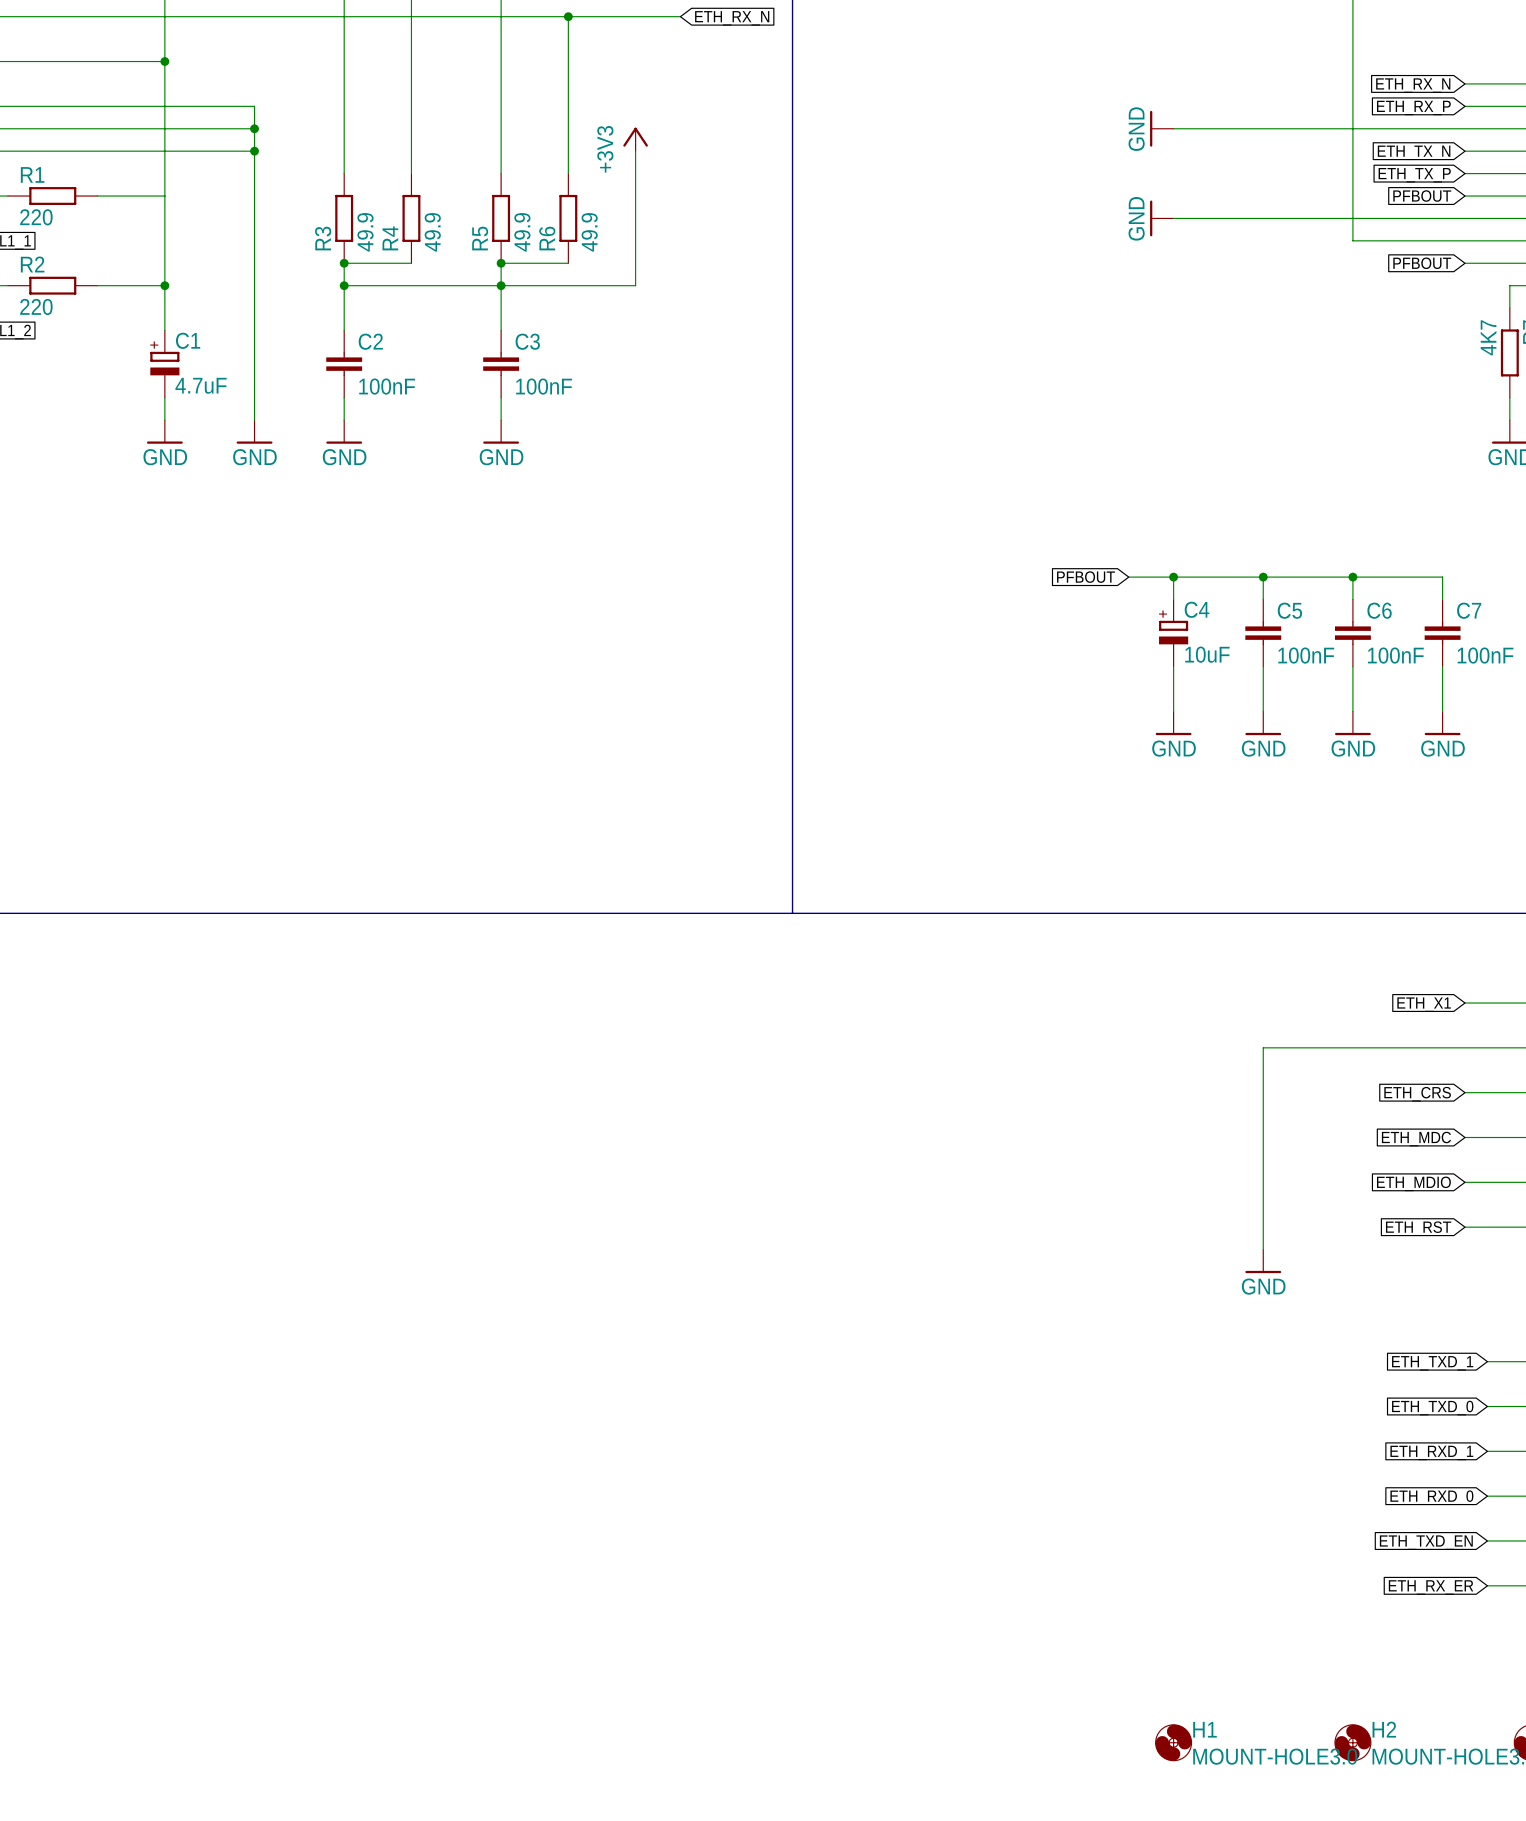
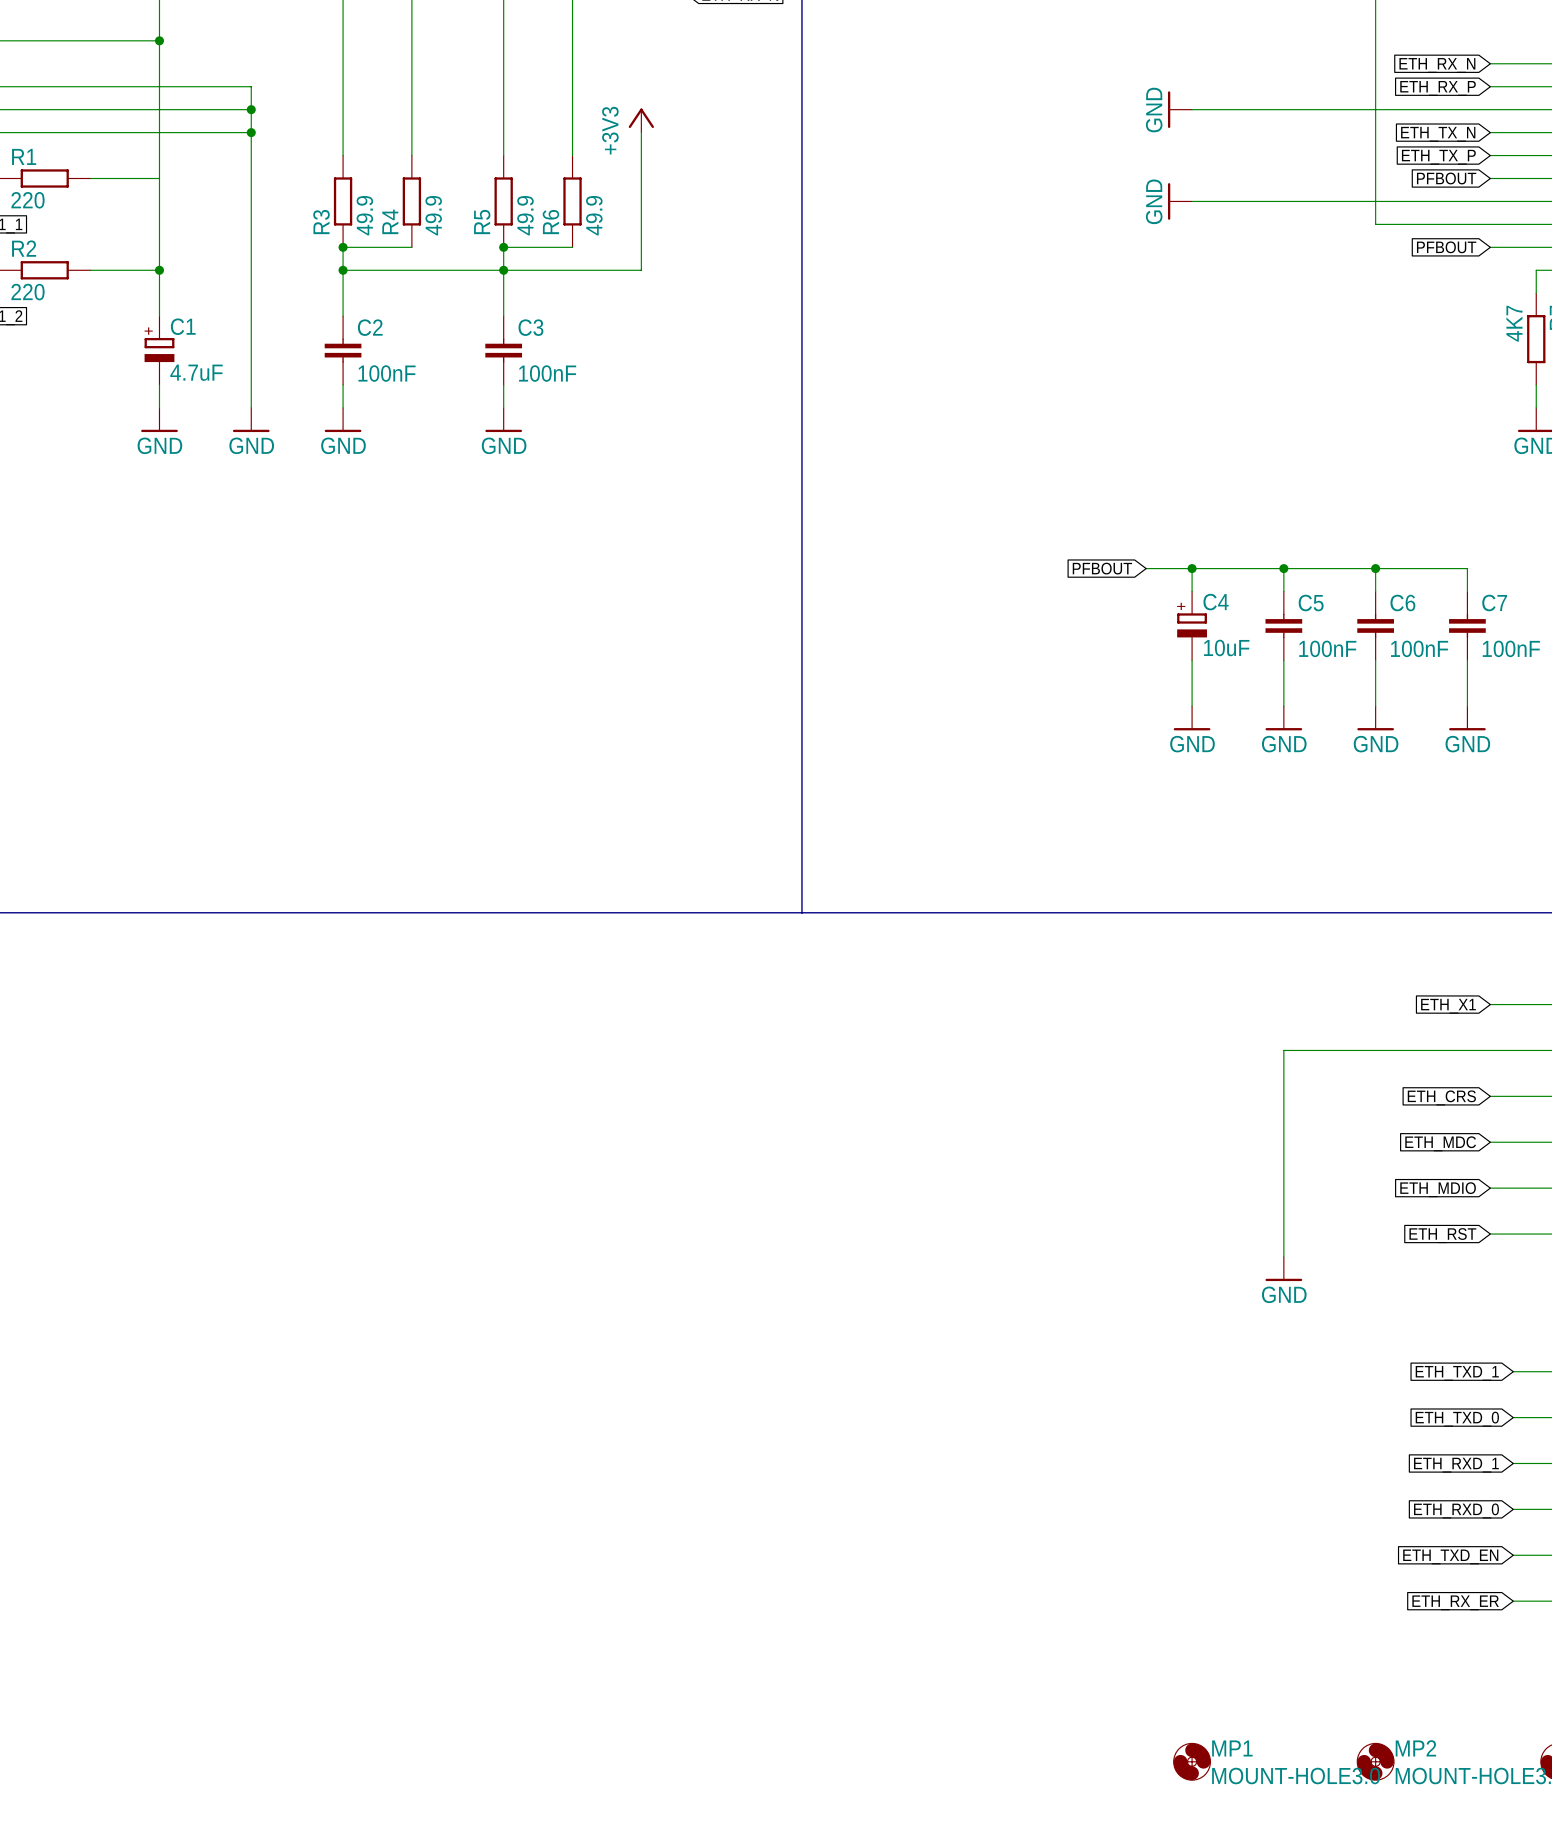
H1 name: H1 (1204, 1729) -> MP1 (1232, 1748)
H2 name: H2 (1384, 1729) -> MP2 (1415, 1748)

